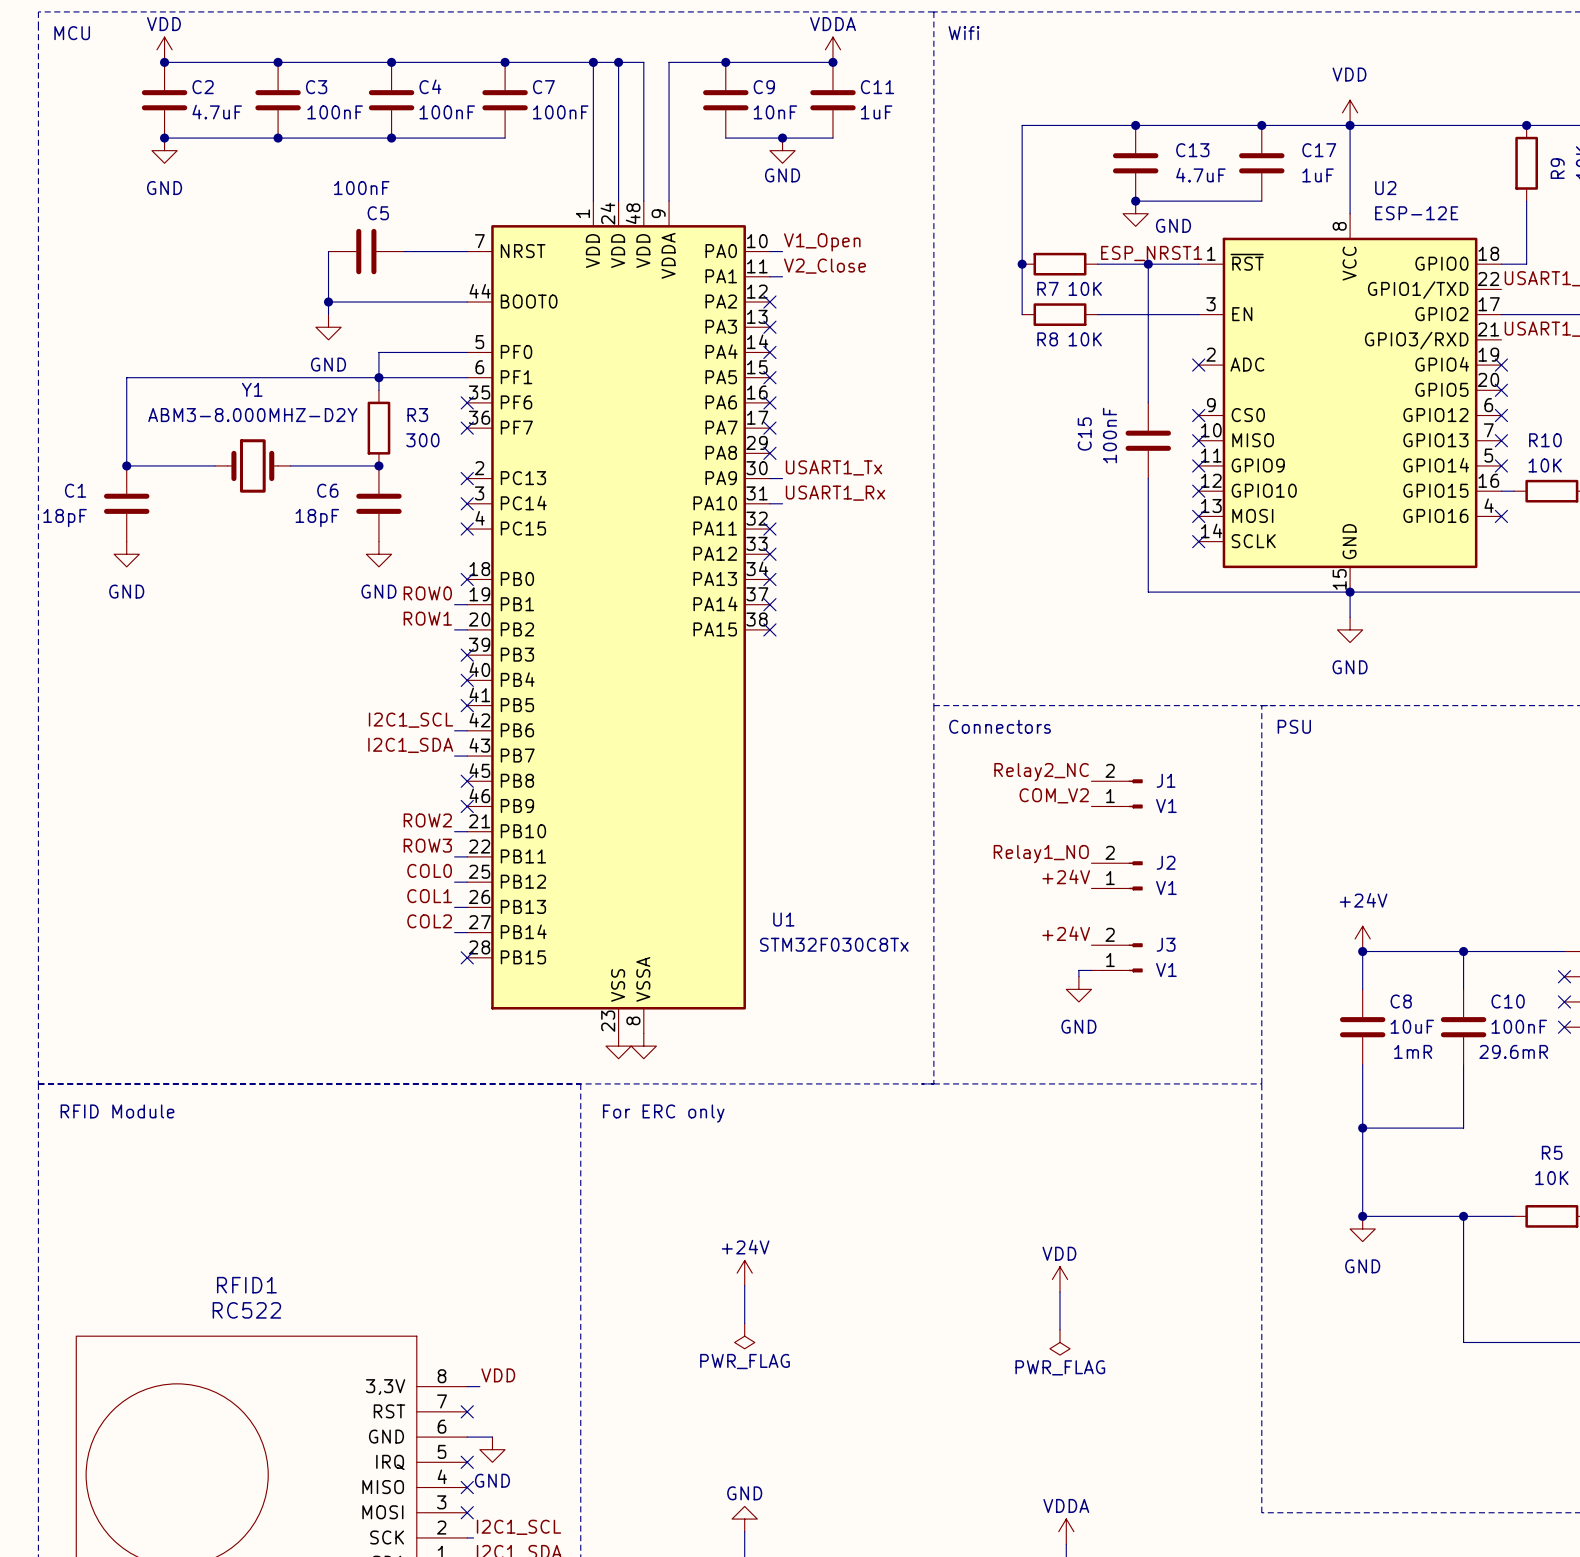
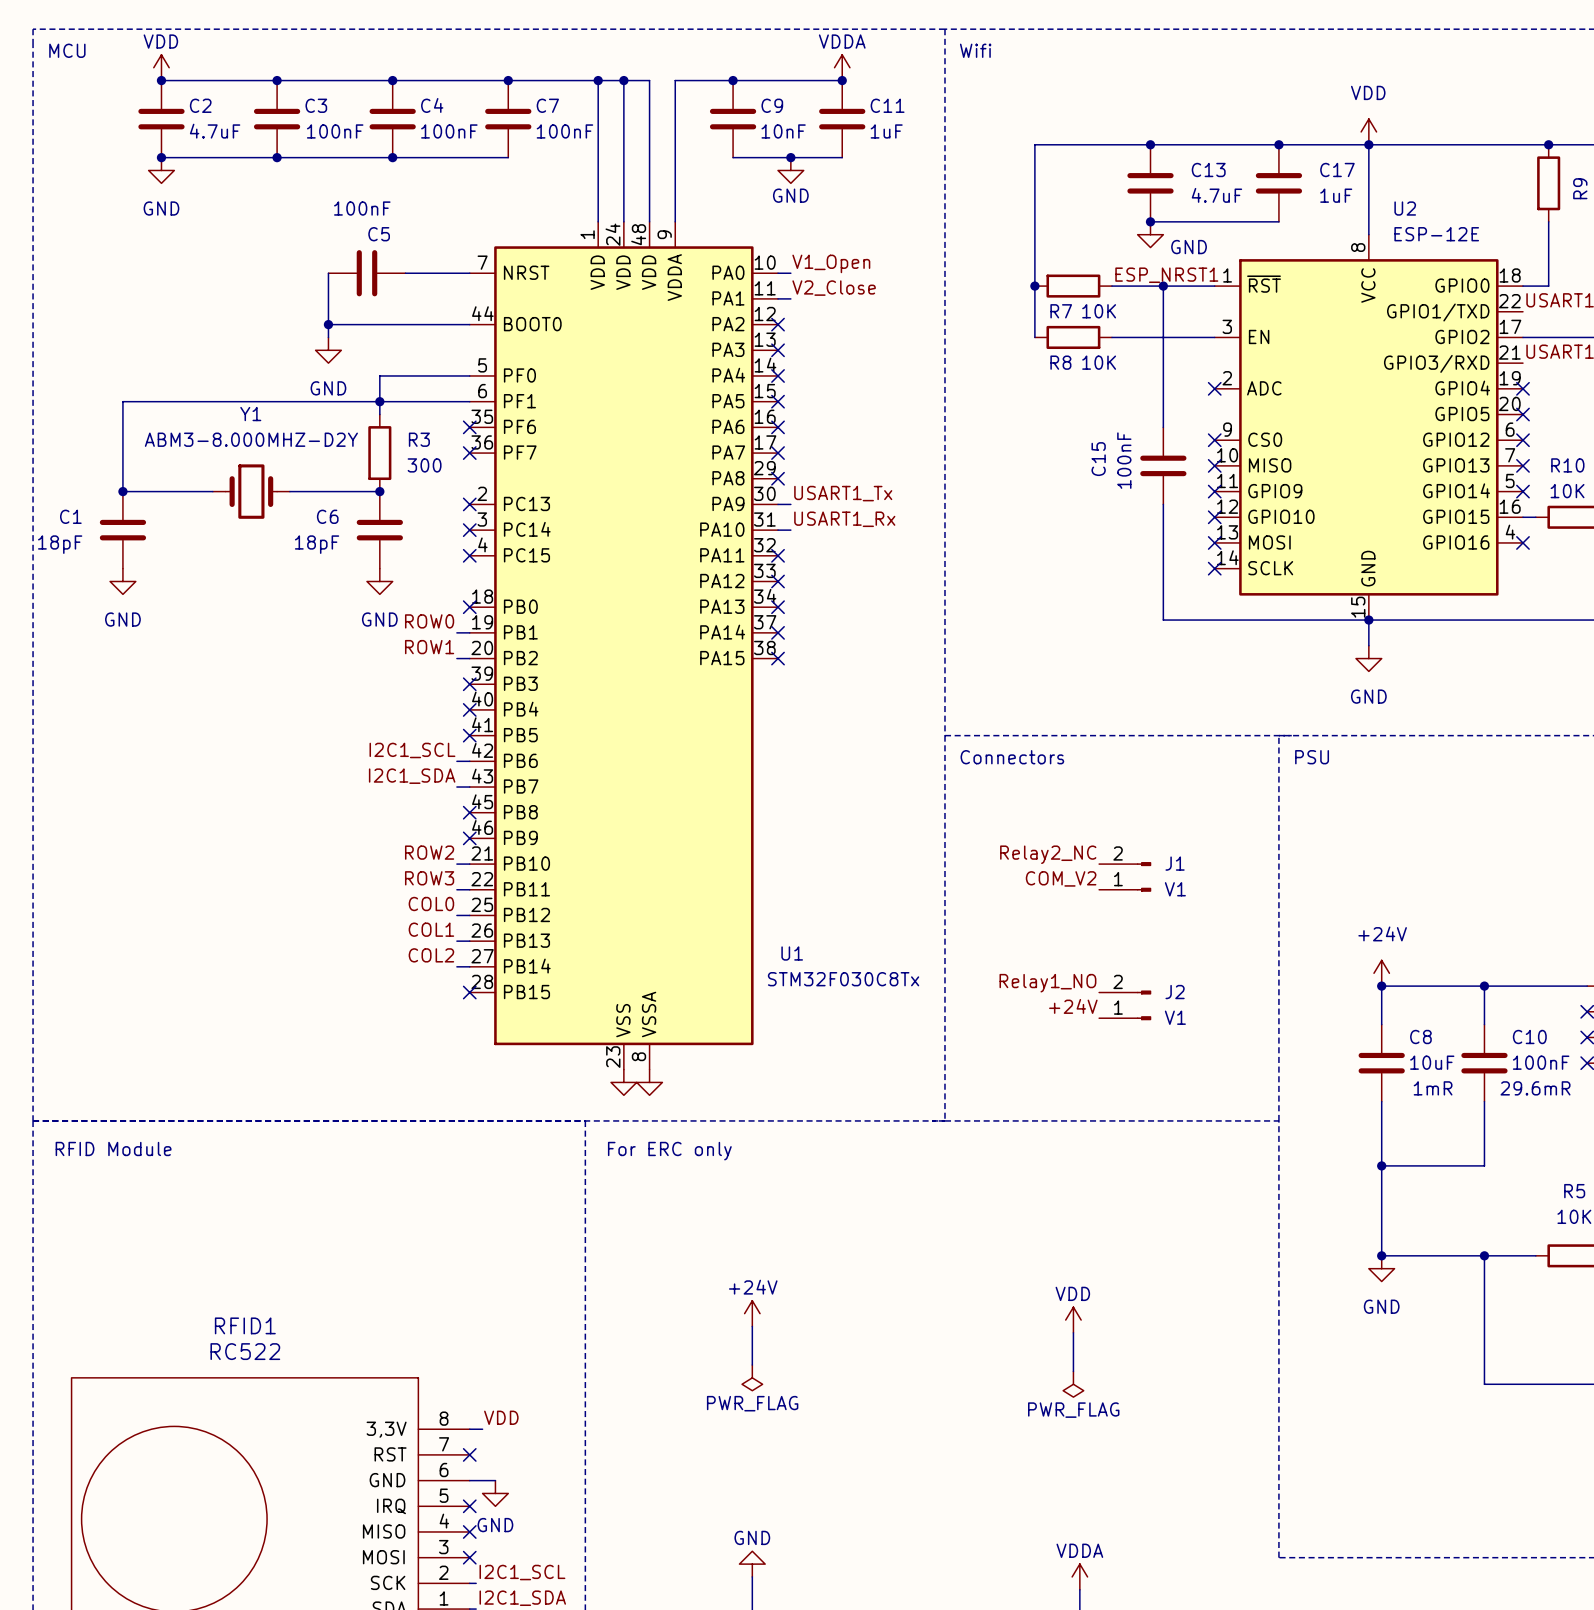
label position: Relay2_NC (1041, 772) -> Relay2_NC (1048, 854)
J1 position: (1117, 793) -> (1125, 876)
label: COM_V2 (1054, 795) -> none
label: Relay1_NO (1041, 854) -> COM_V2 (1061, 878)
J2 position: (1117, 875) -> (1125, 1005)
label: +24V (1066, 876) -> none
label position: +24V (1066, 933) -> +24V (1073, 1006)
label: none -> Relay1_NO (1047, 983)
J3: V1 (1117, 957) -> none
wire: (1091, 970) (1078, 970) (1078, 976) -> none
power symbol: GND (1078, 989) -> none

